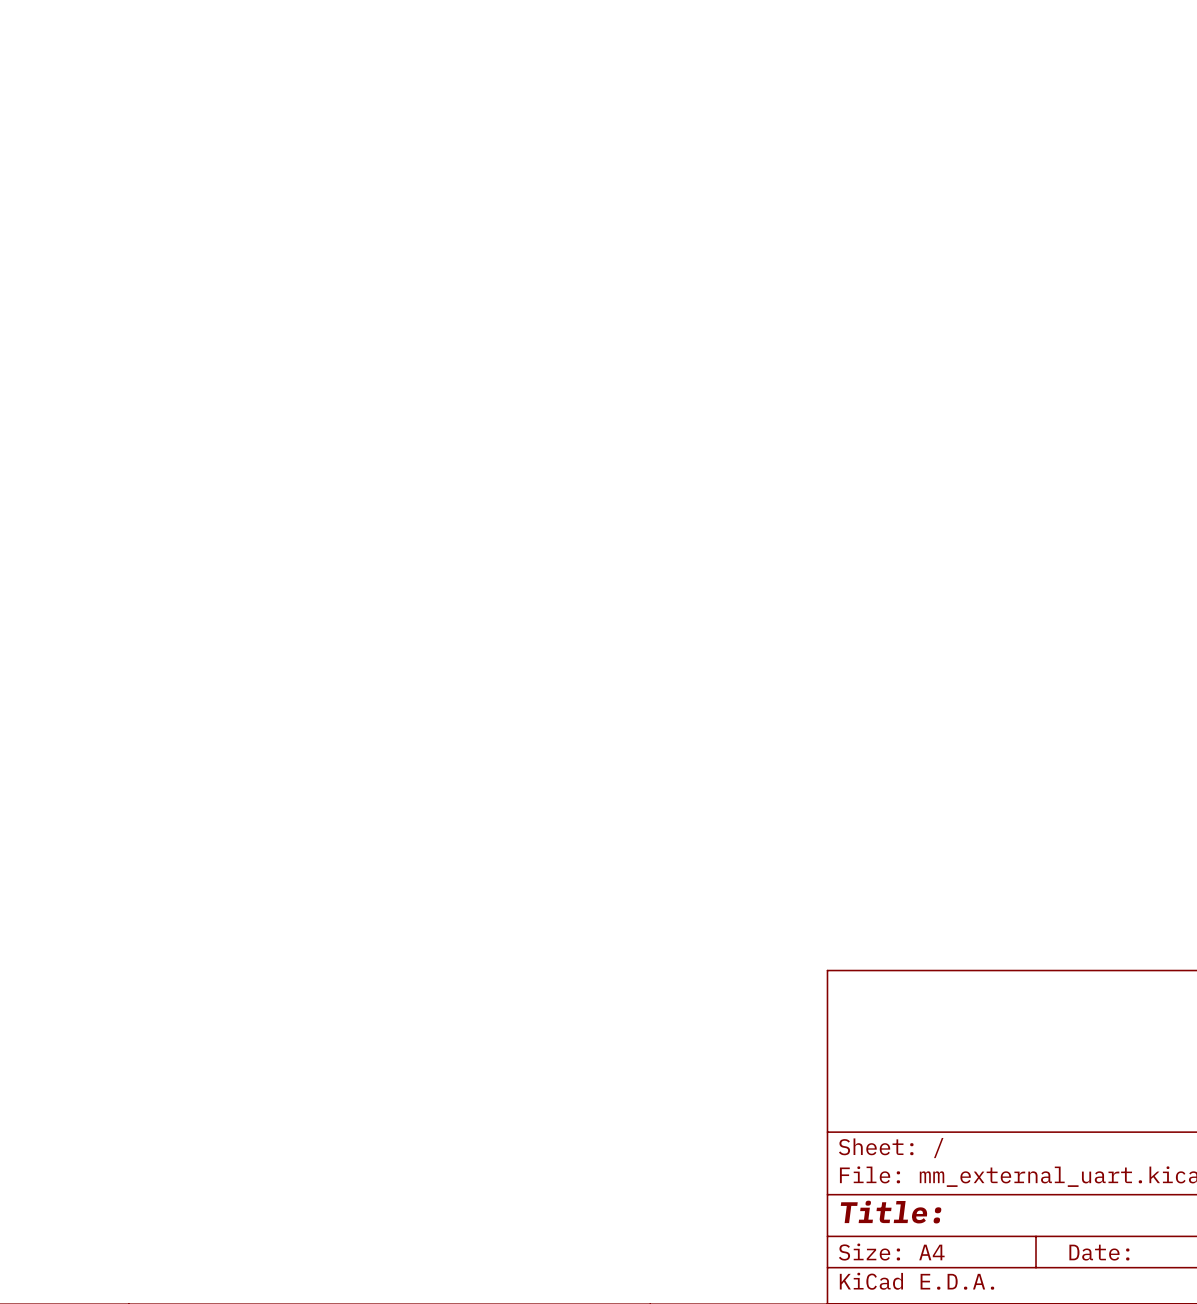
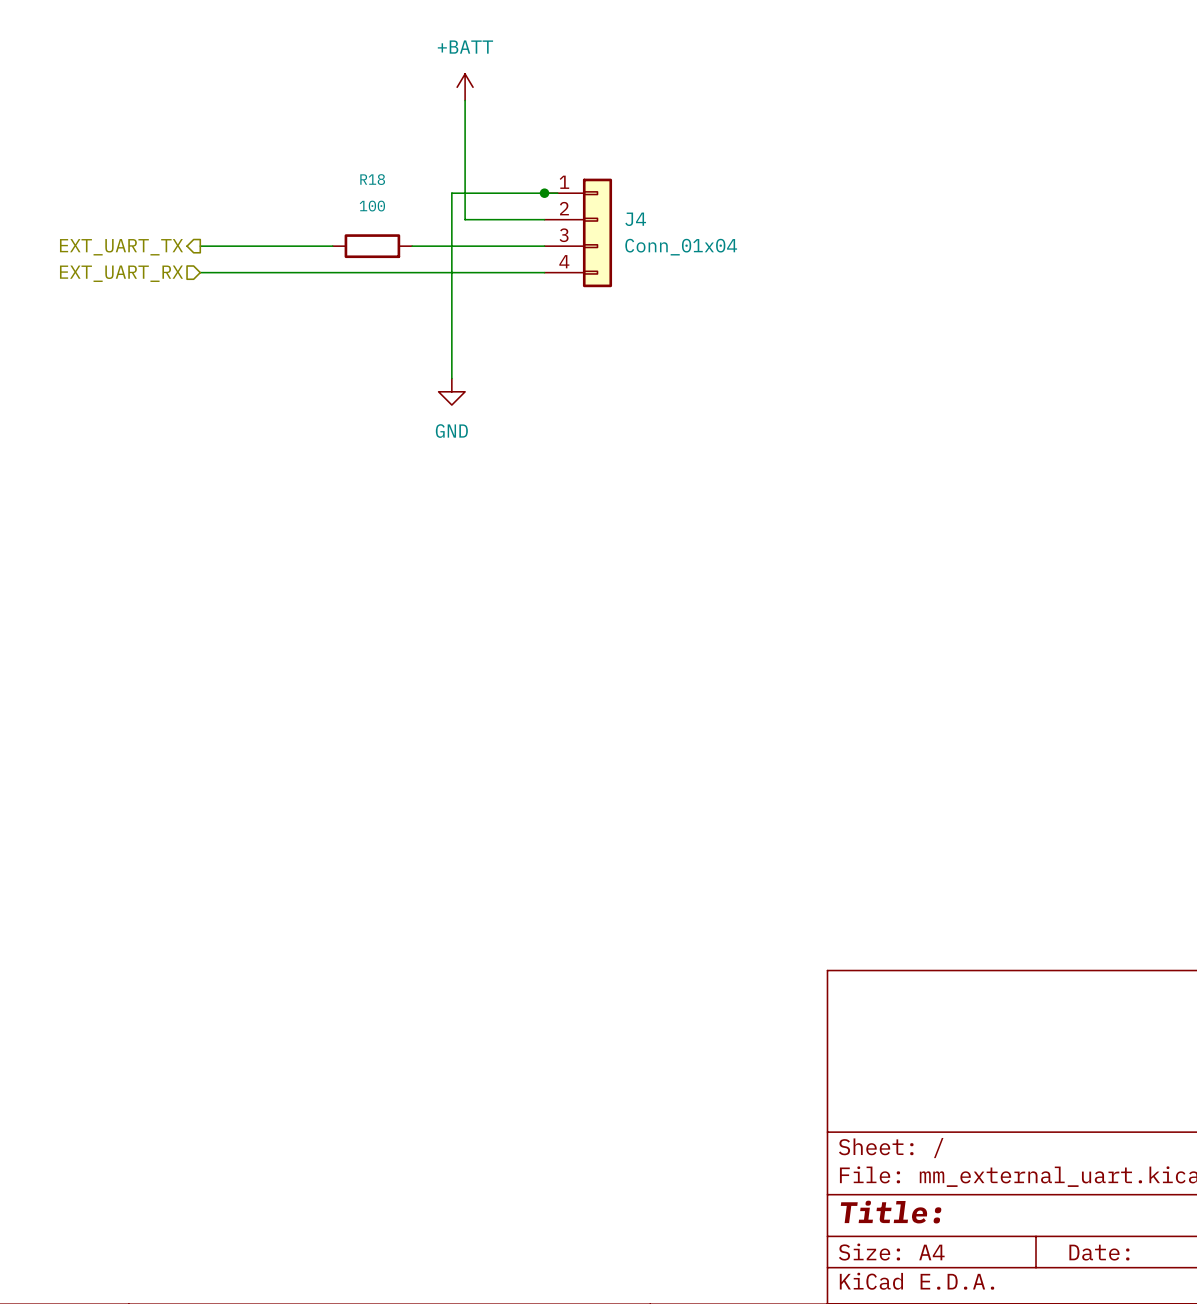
power symbol: none -> +BATT (465, 87)
wire: none -> (465, 100) (465, 219) (544, 219)
junction: none -> (544, 193)
wire: none -> (557, 193) (451, 193) (451, 378)
J4: none -> Conn_01x04 (578, 232)
wire: none -> (200, 246) (332, 246)
R18: none -> 100 (372, 246)
wire: none -> (412, 246) (544, 246)
hierarchical label: none -> EXT_UART_TX (121, 247)
wire: none -> (200, 272) (544, 272)
hierarchical label: none -> EXT_UART_RX (121, 273)
power symbol: none -> GND (451, 391)

